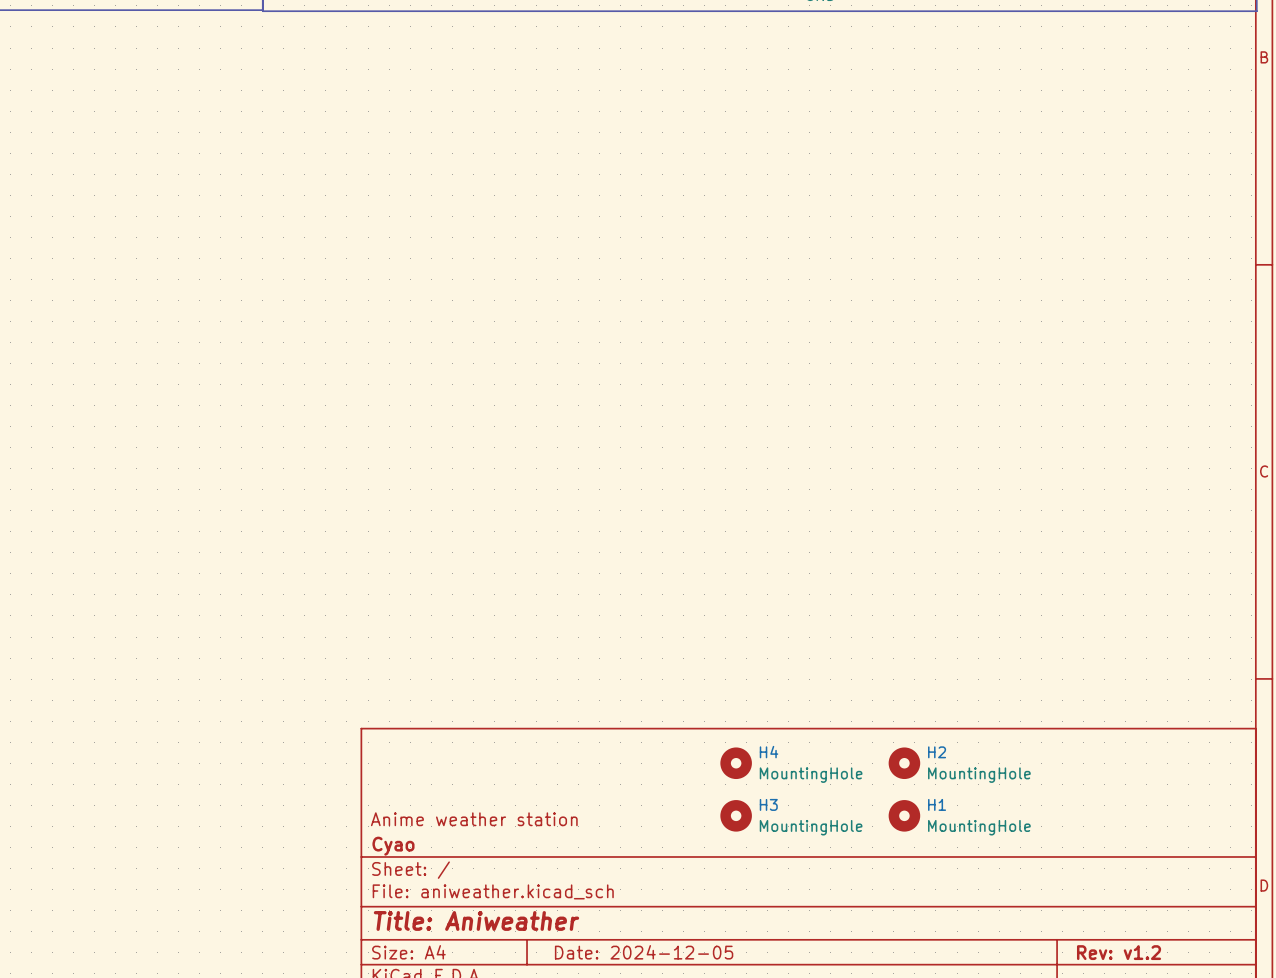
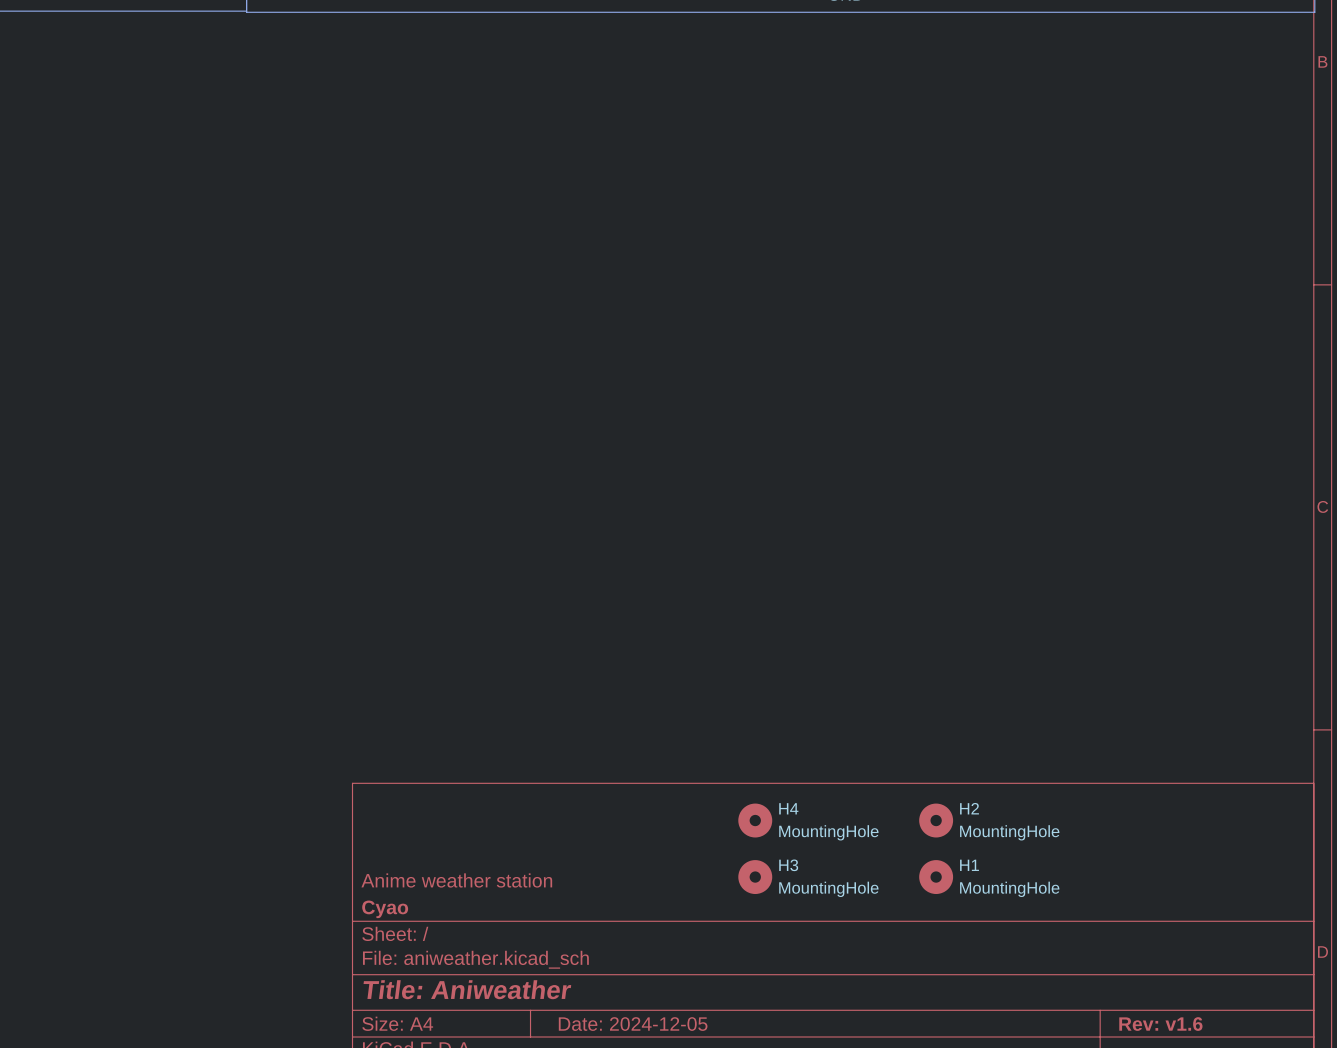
title block: Rev: v1.2 (1119, 952) -> Rev: v1.6 (1160, 1024)

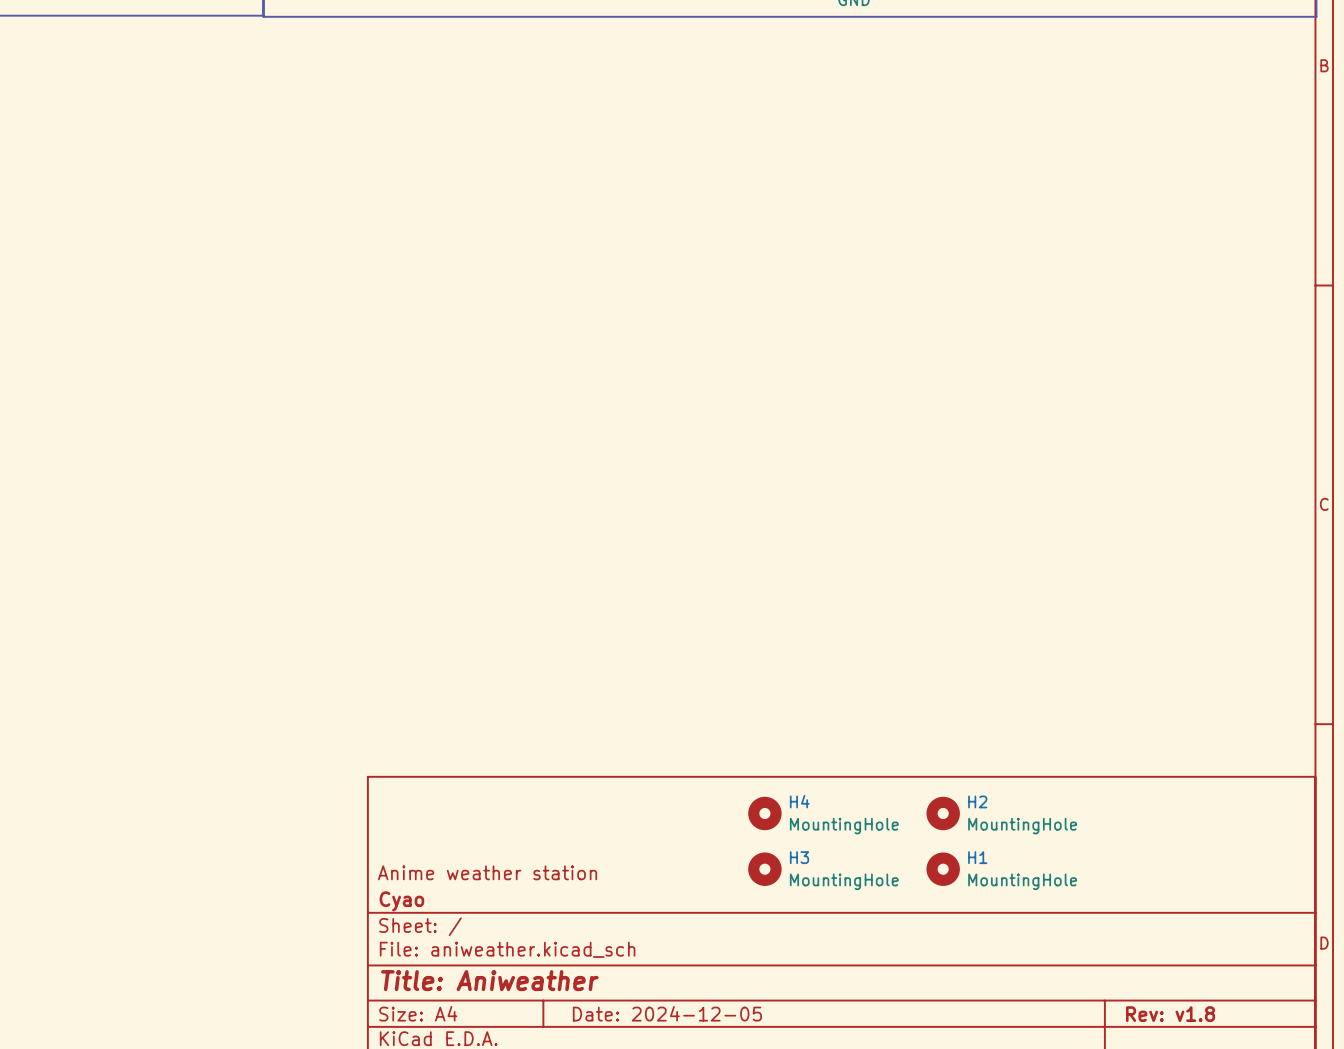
title block: Rev: v1.6 (1160, 1024) -> Rev: v1.8 (1170, 1014)

